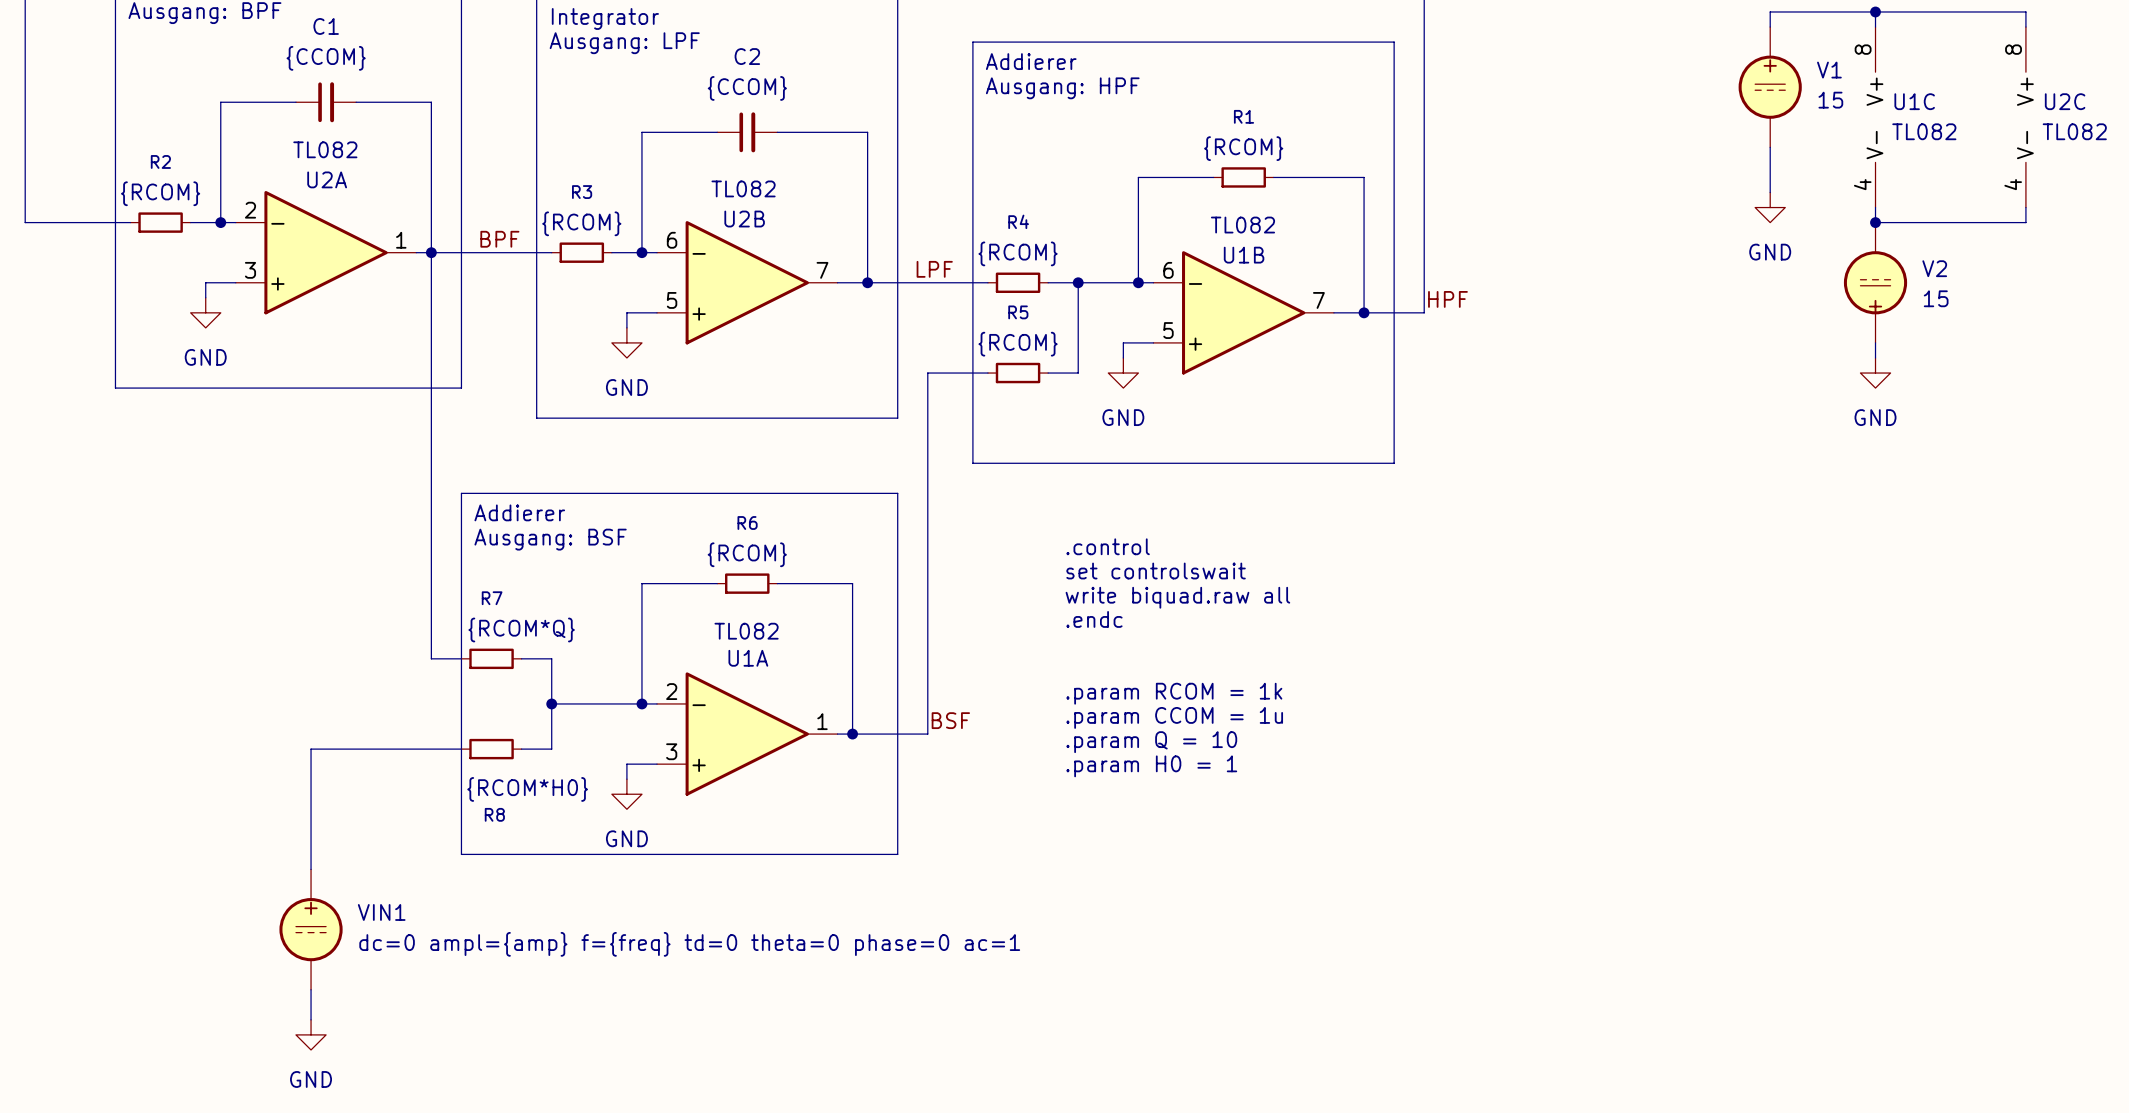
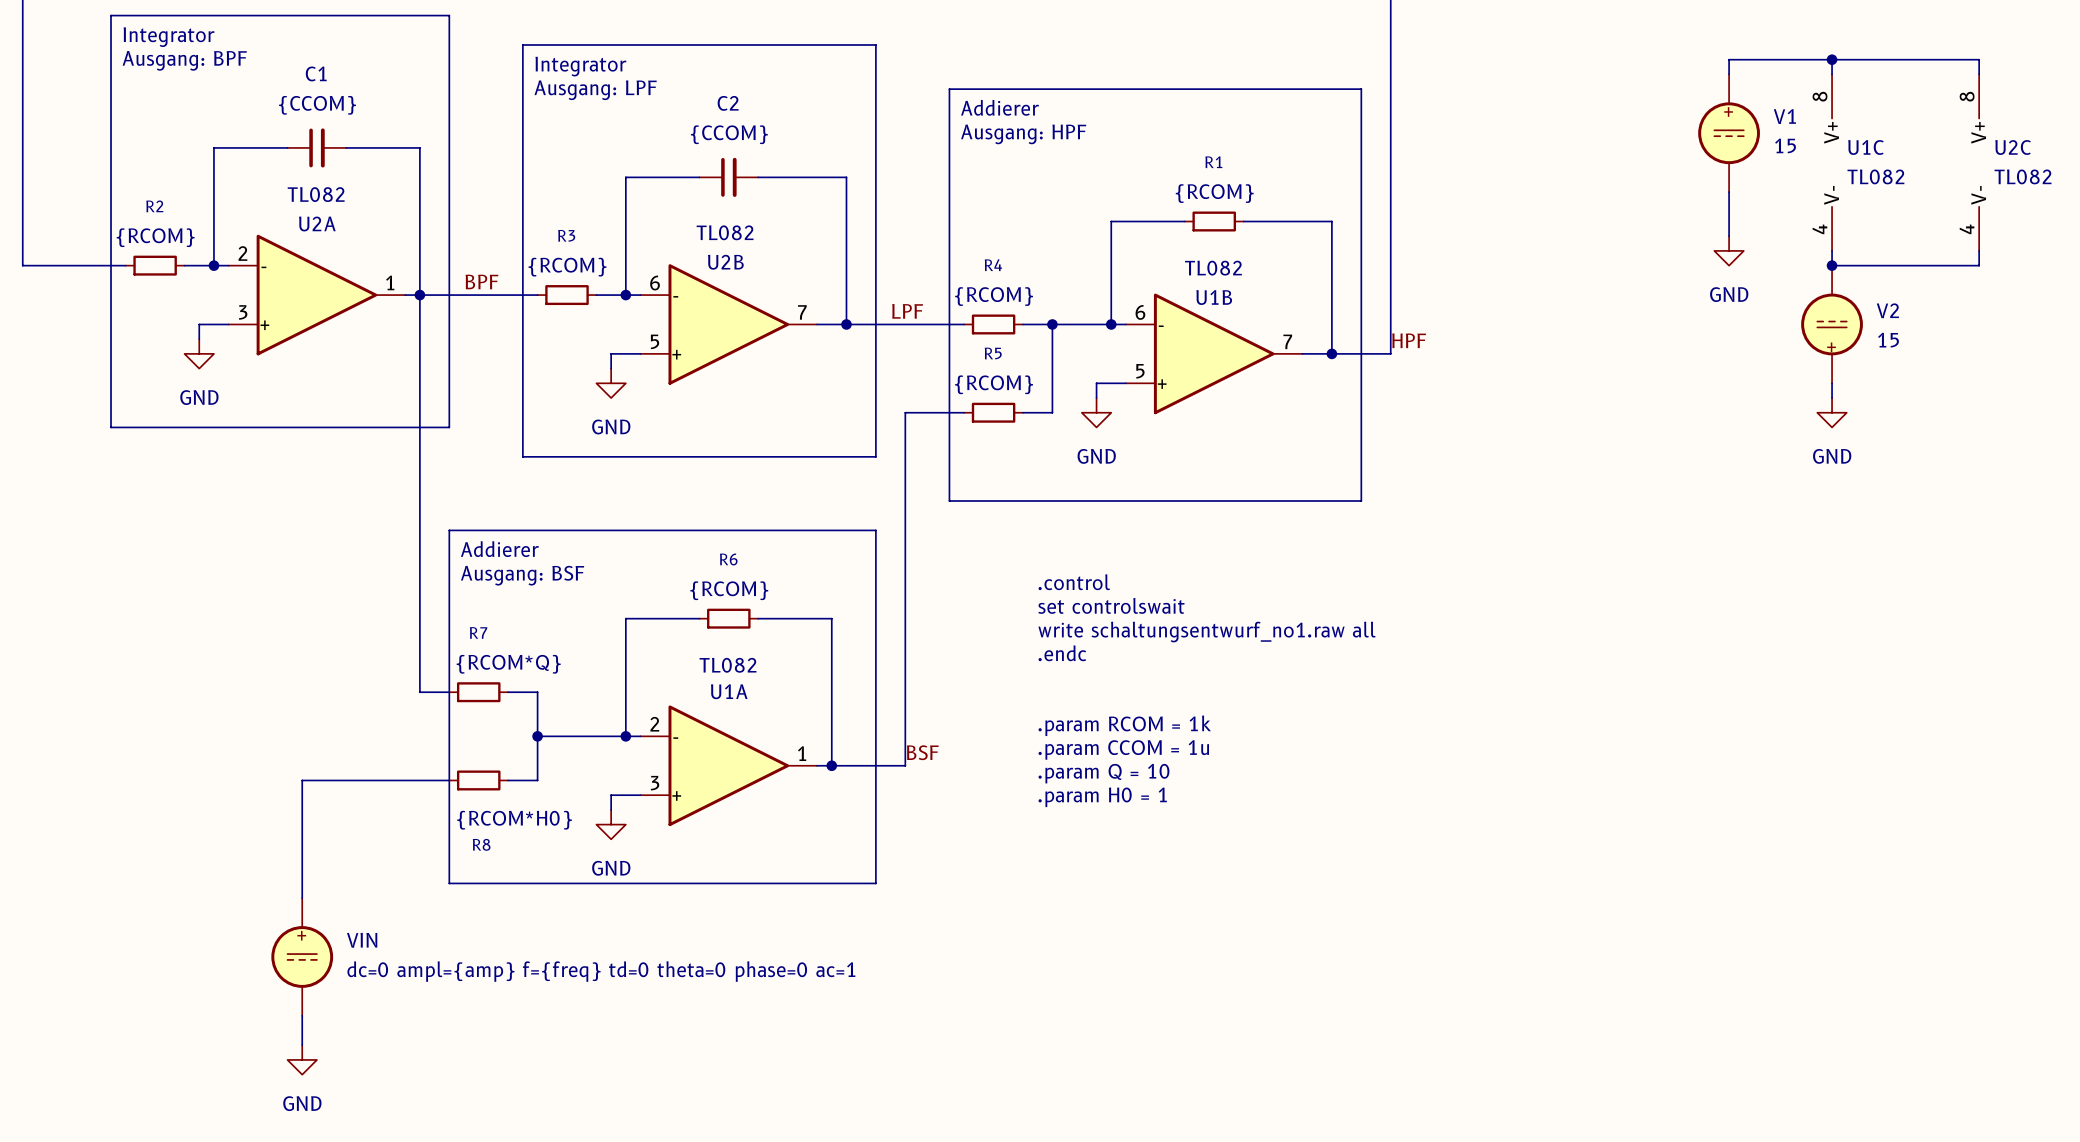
text: write biquad.raw all (1177, 597) -> write schaltungsentwurf_no1.raw all (1207, 632)
VIN1 name: VIN1 (381, 912) -> VIN (362, 940)

